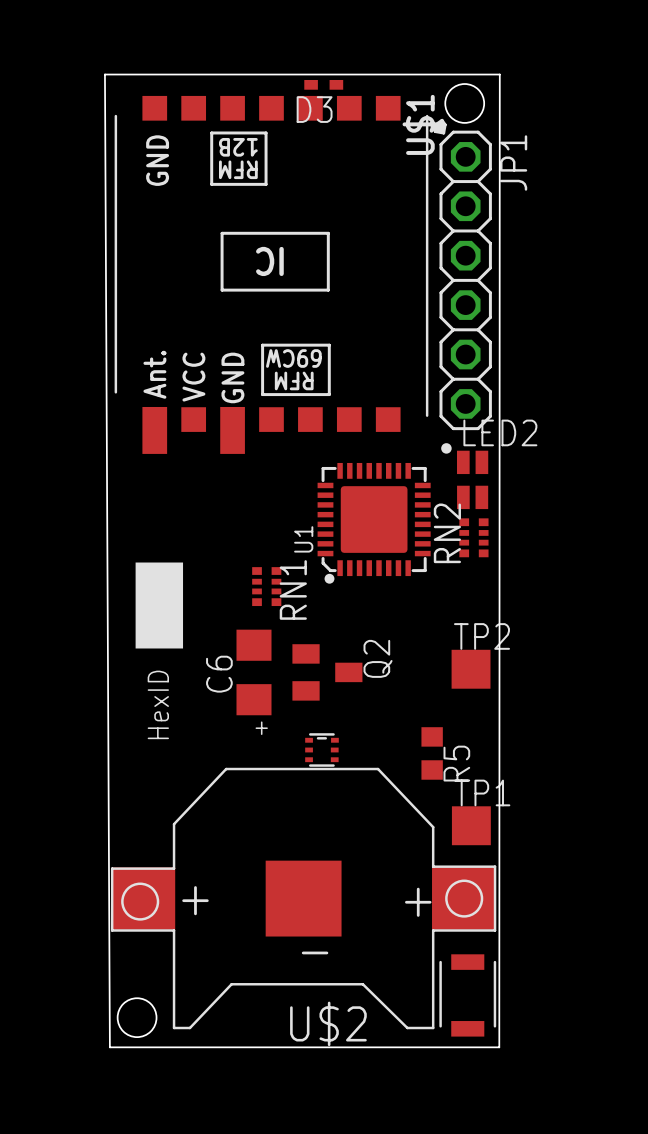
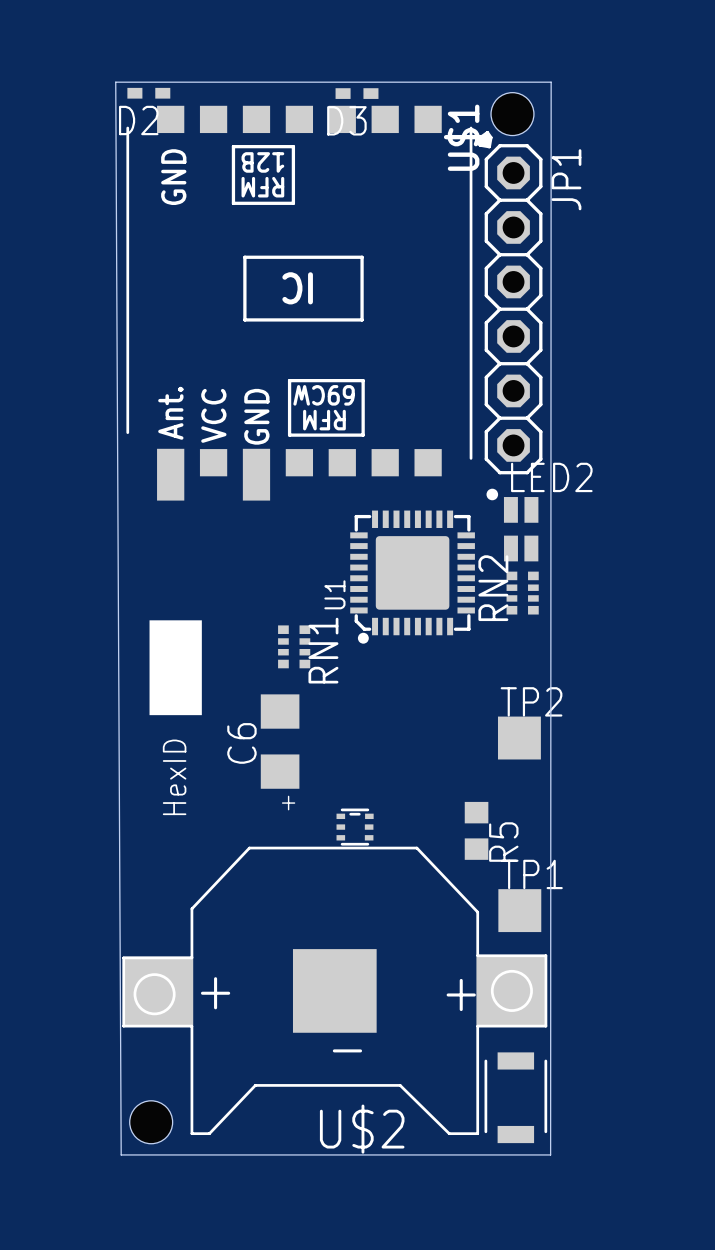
D2: none -> (148, 93)
Q2: (327, 672) -> none

